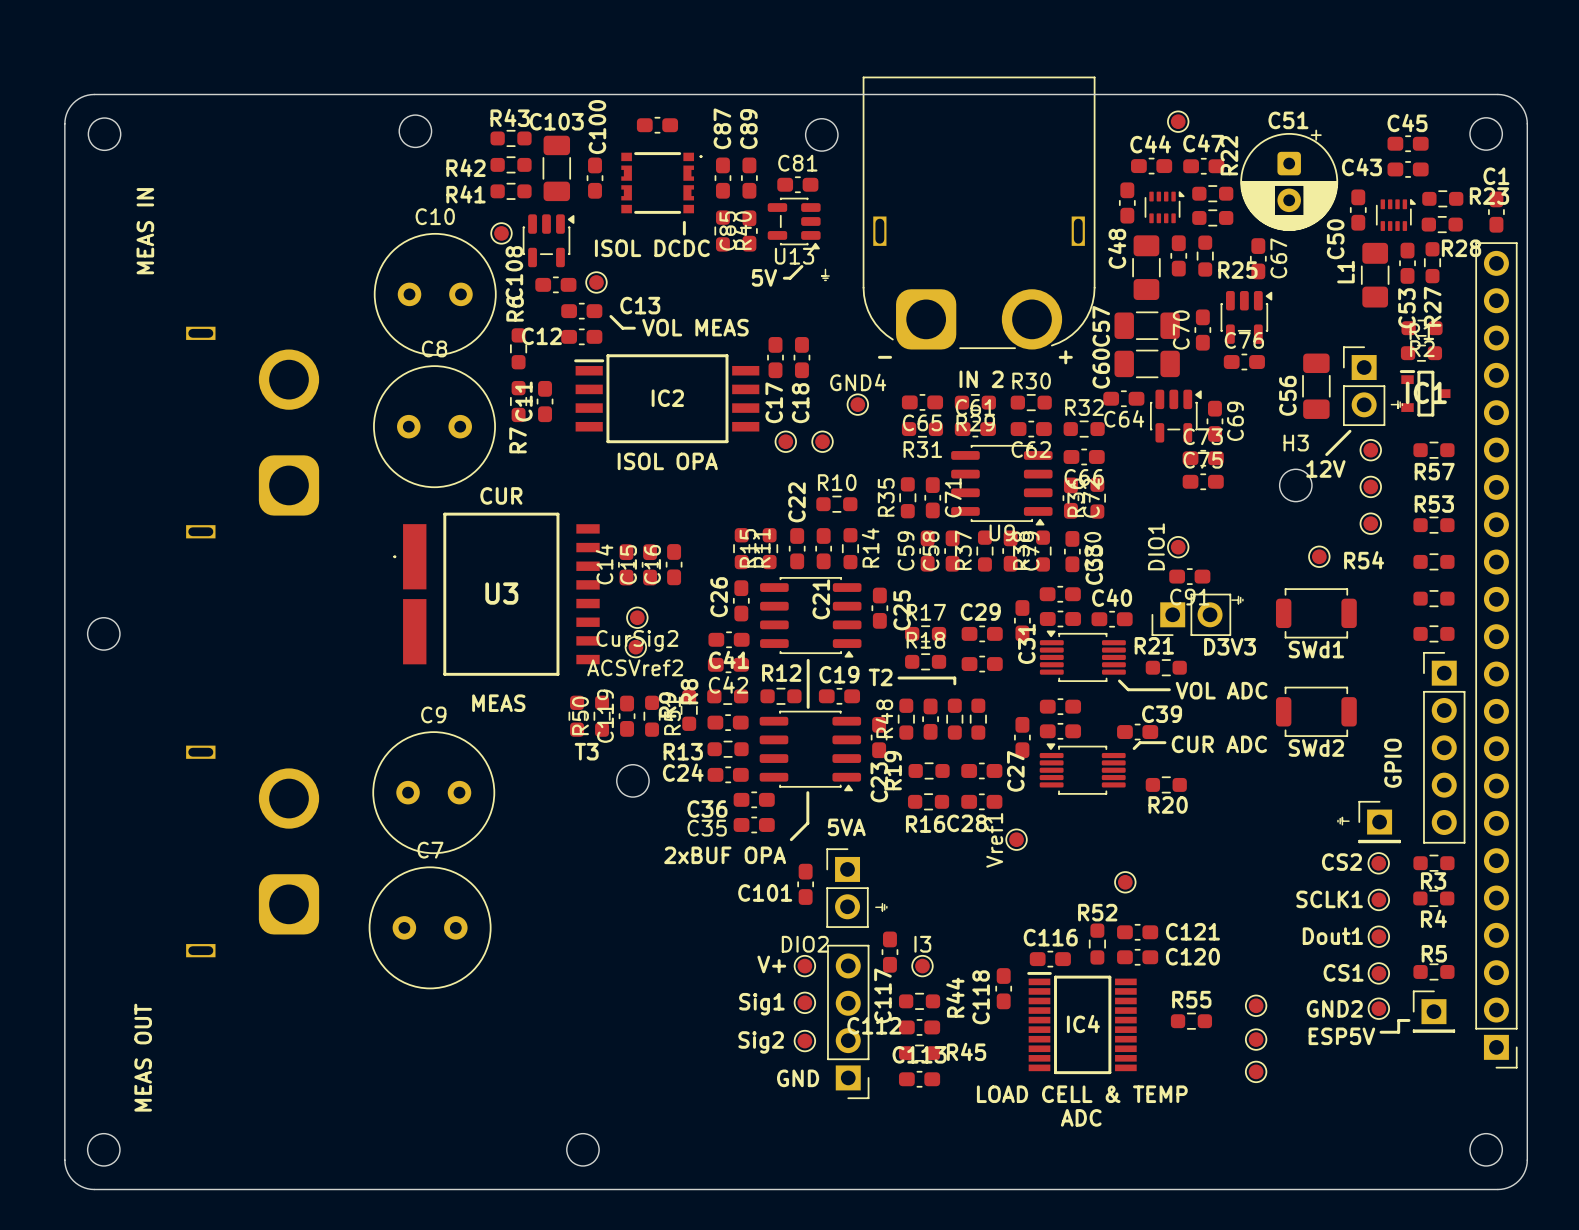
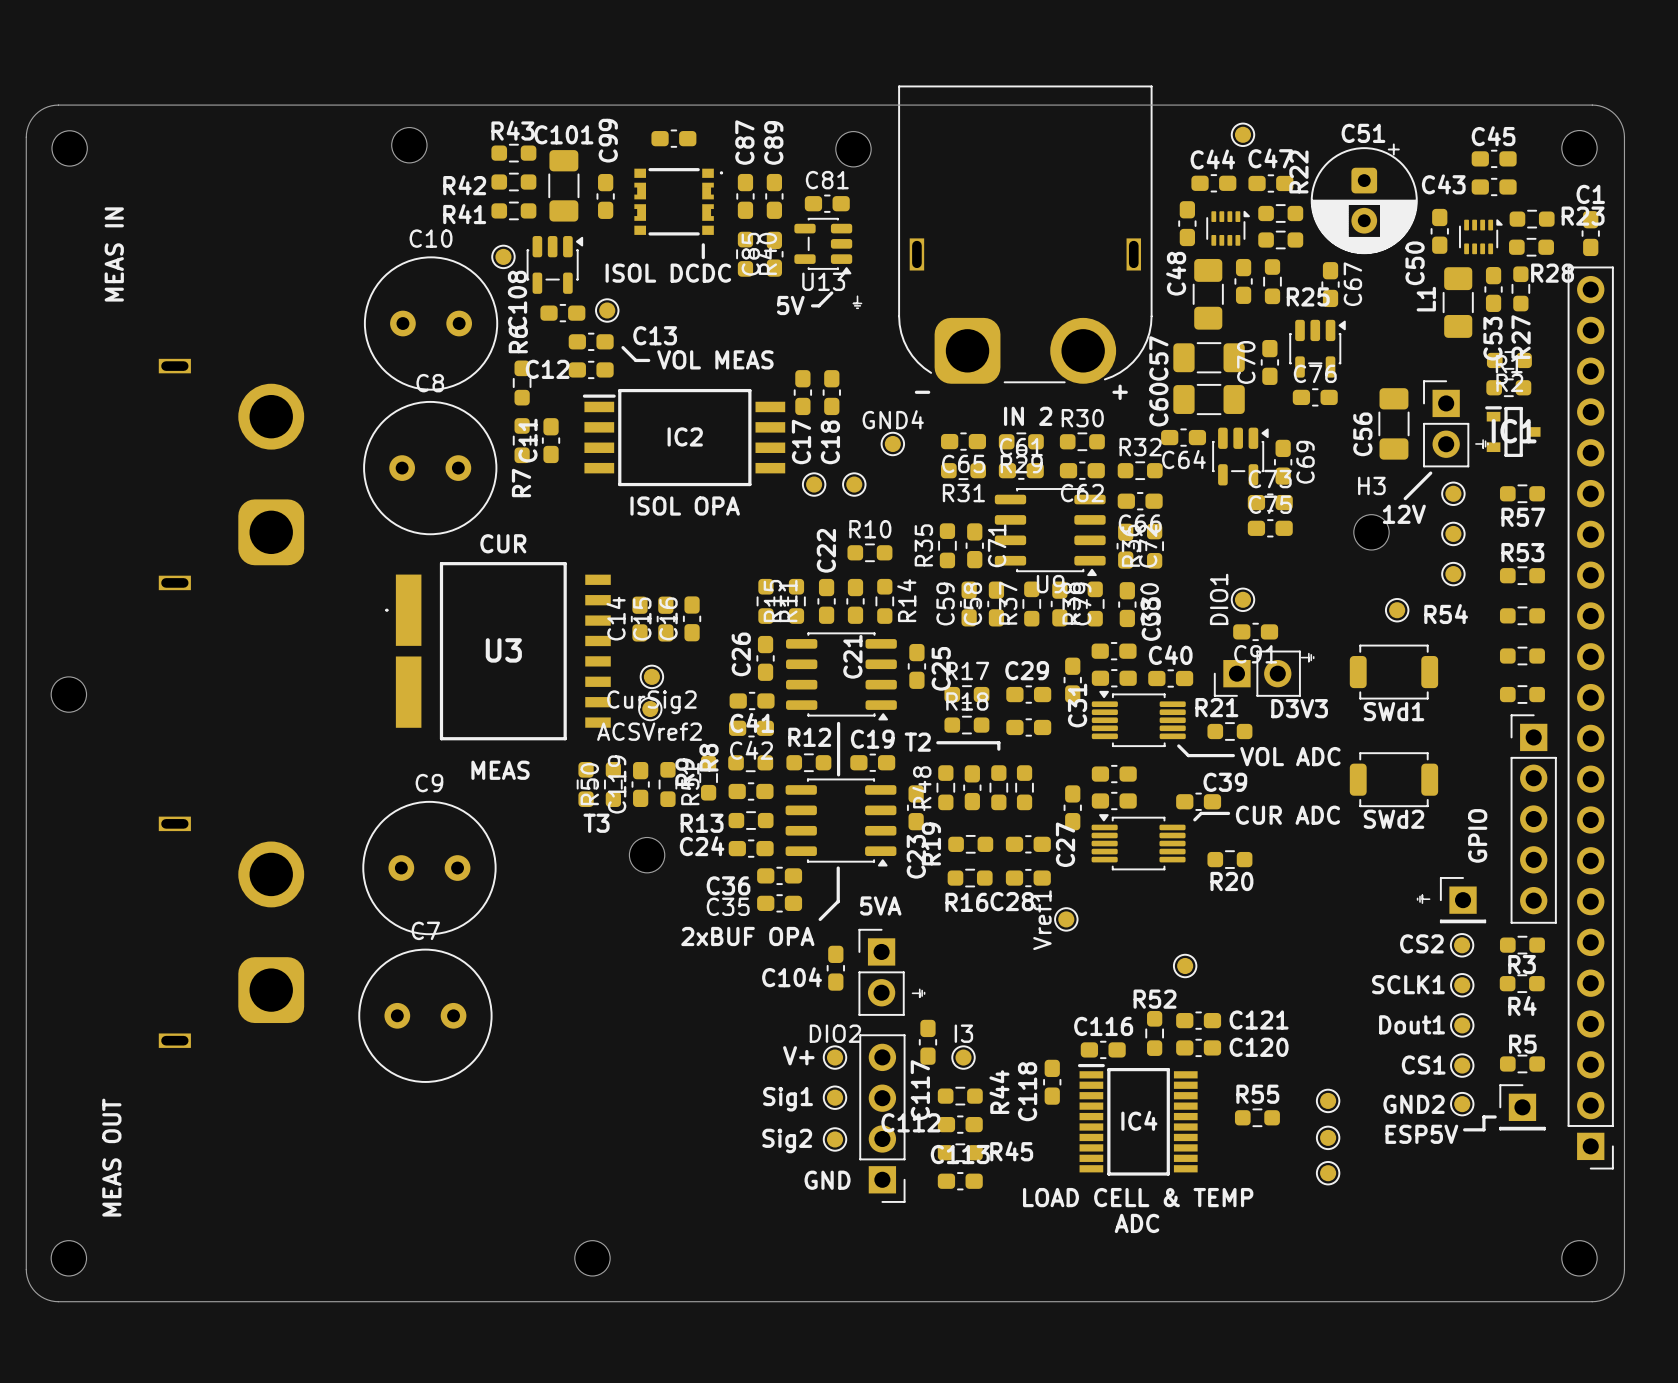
C103 name: C103 (556, 121) -> C101 (563, 134)
C100 name: C100 (597, 127) -> C99 (608, 140)
C101 name: C101 (765, 892) -> C104 (792, 977)

